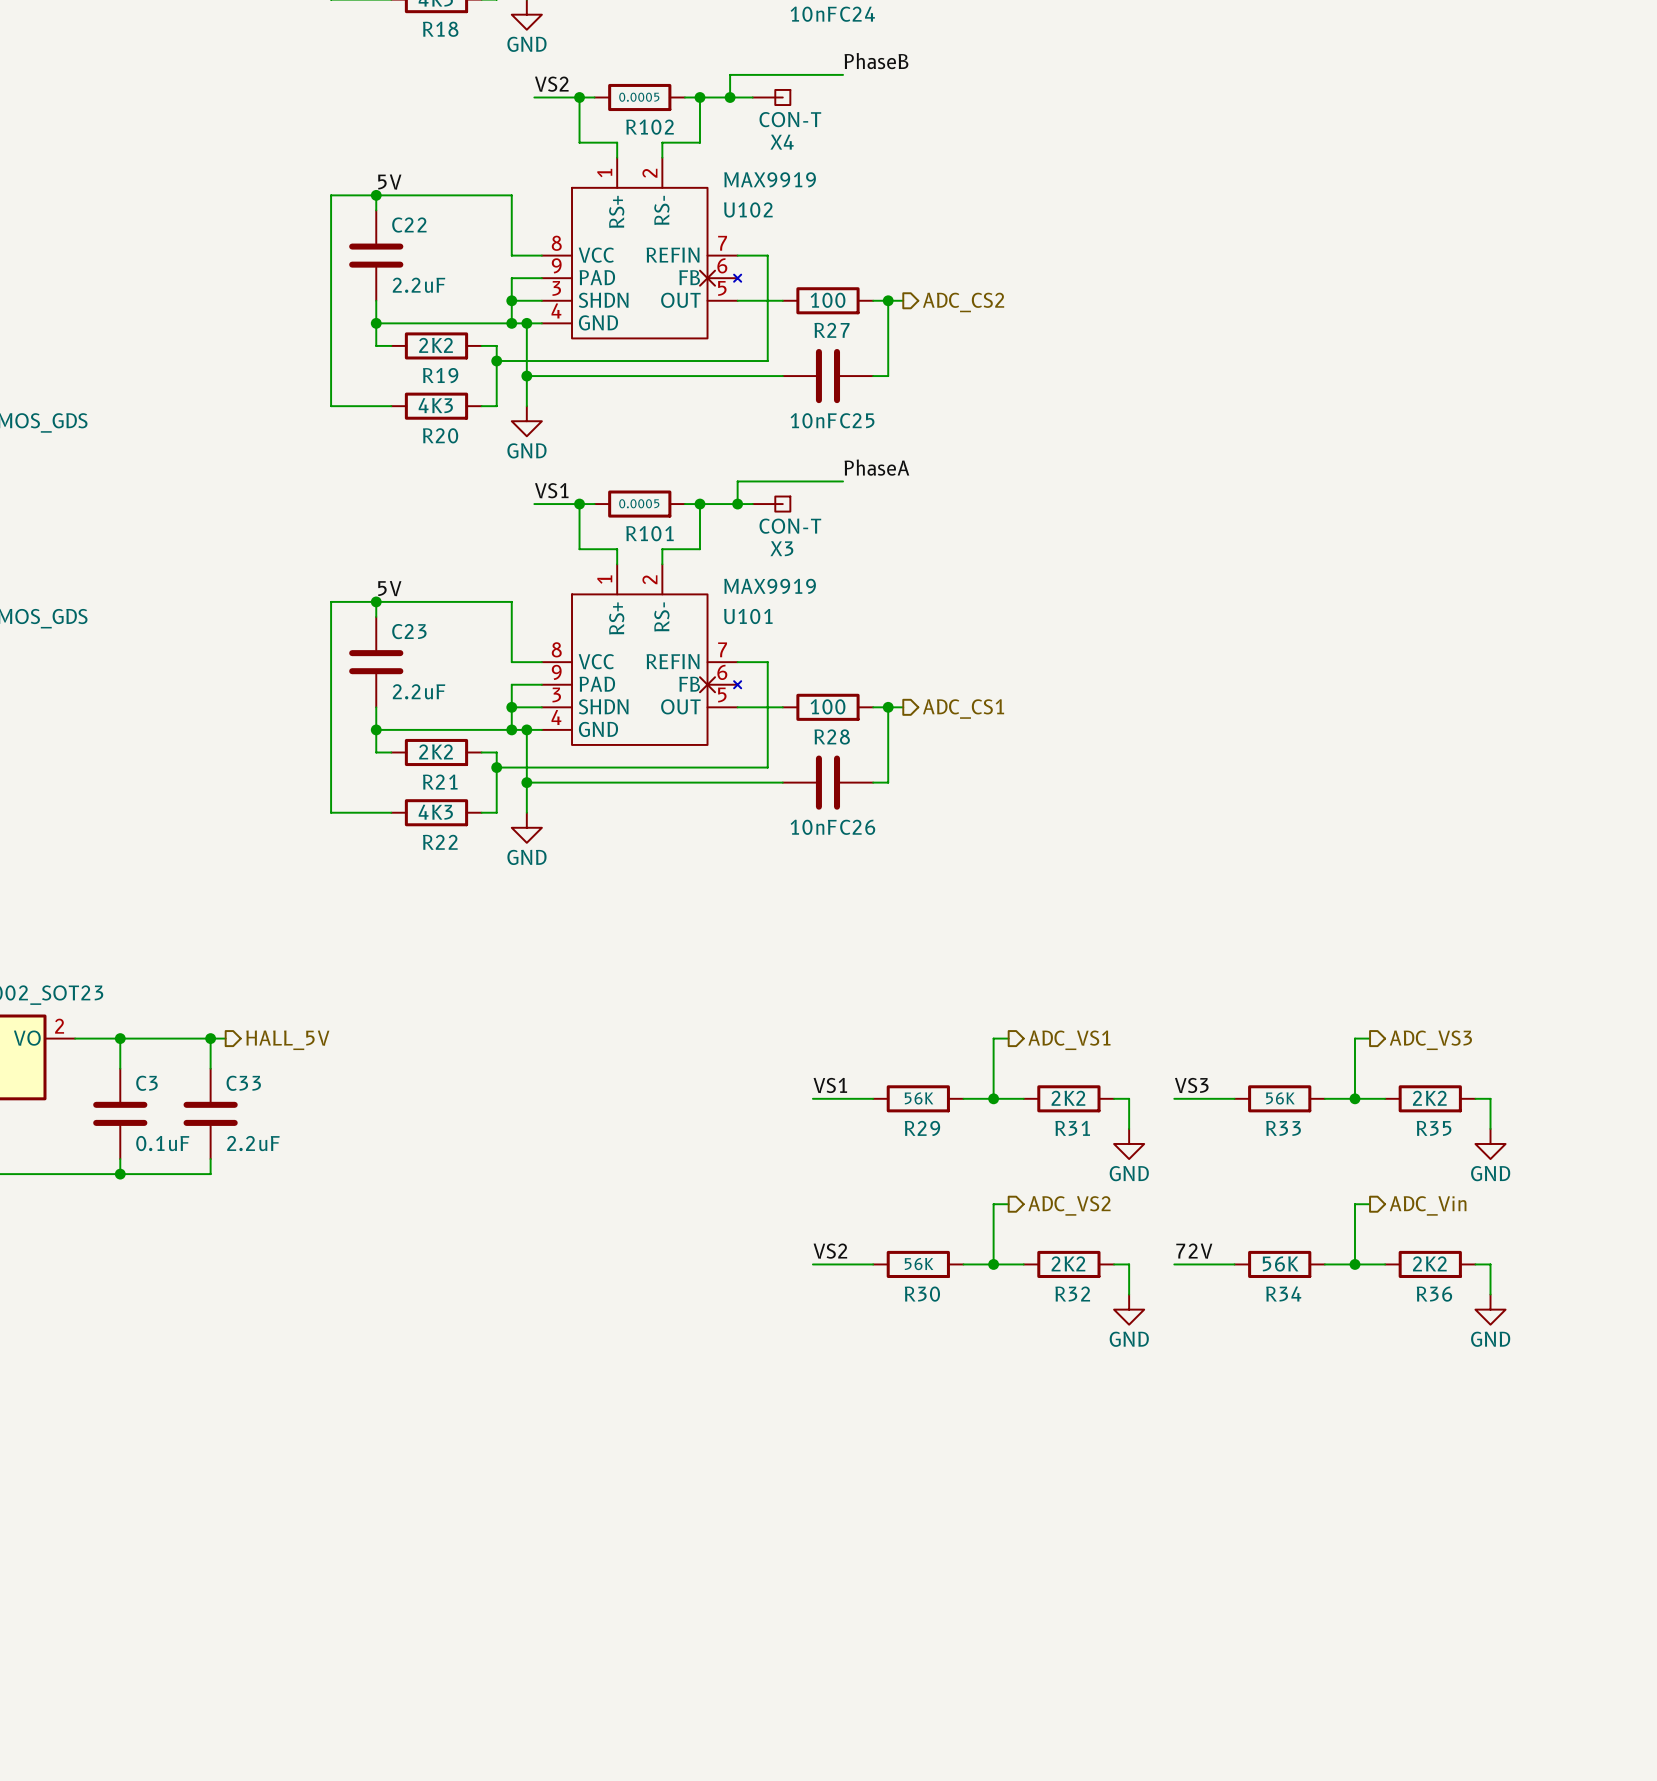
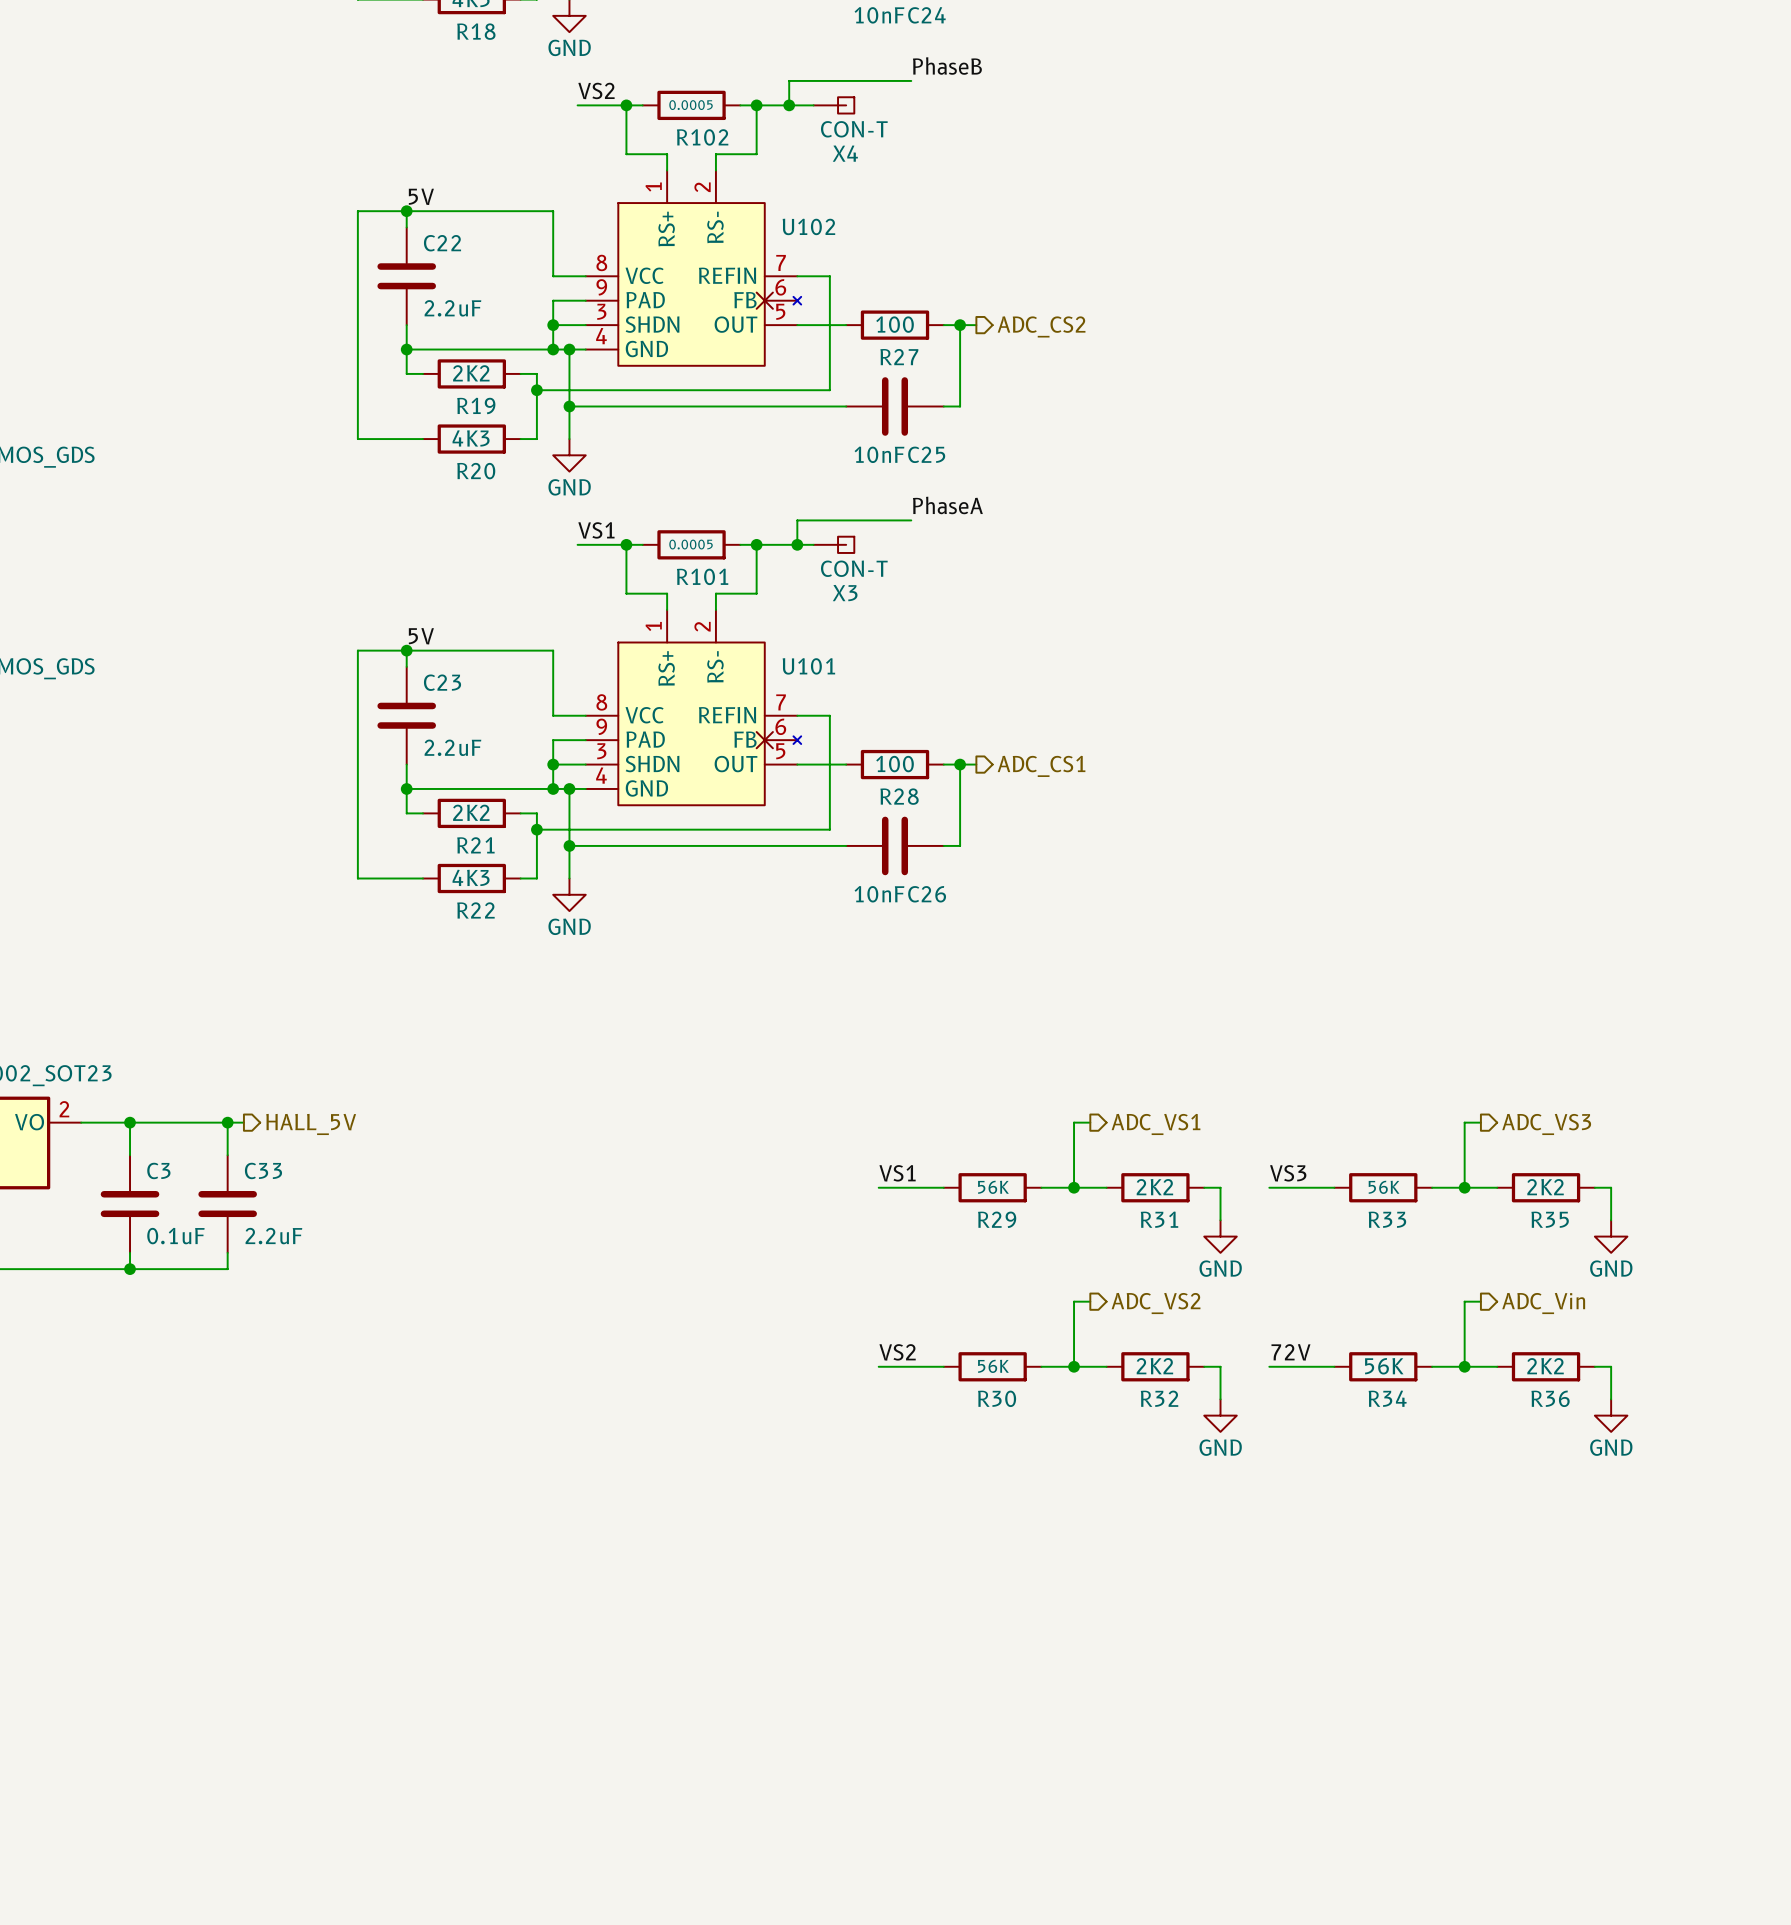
U102 symbol: [541, 157, 742, 339] -> [585, 170, 802, 366]
U102 value: MAX9919 (770, 179) -> none
U101 symbol: [541, 564, 742, 745] -> [585, 609, 802, 806]
U101 value: MAX9919 (770, 586) -> none

